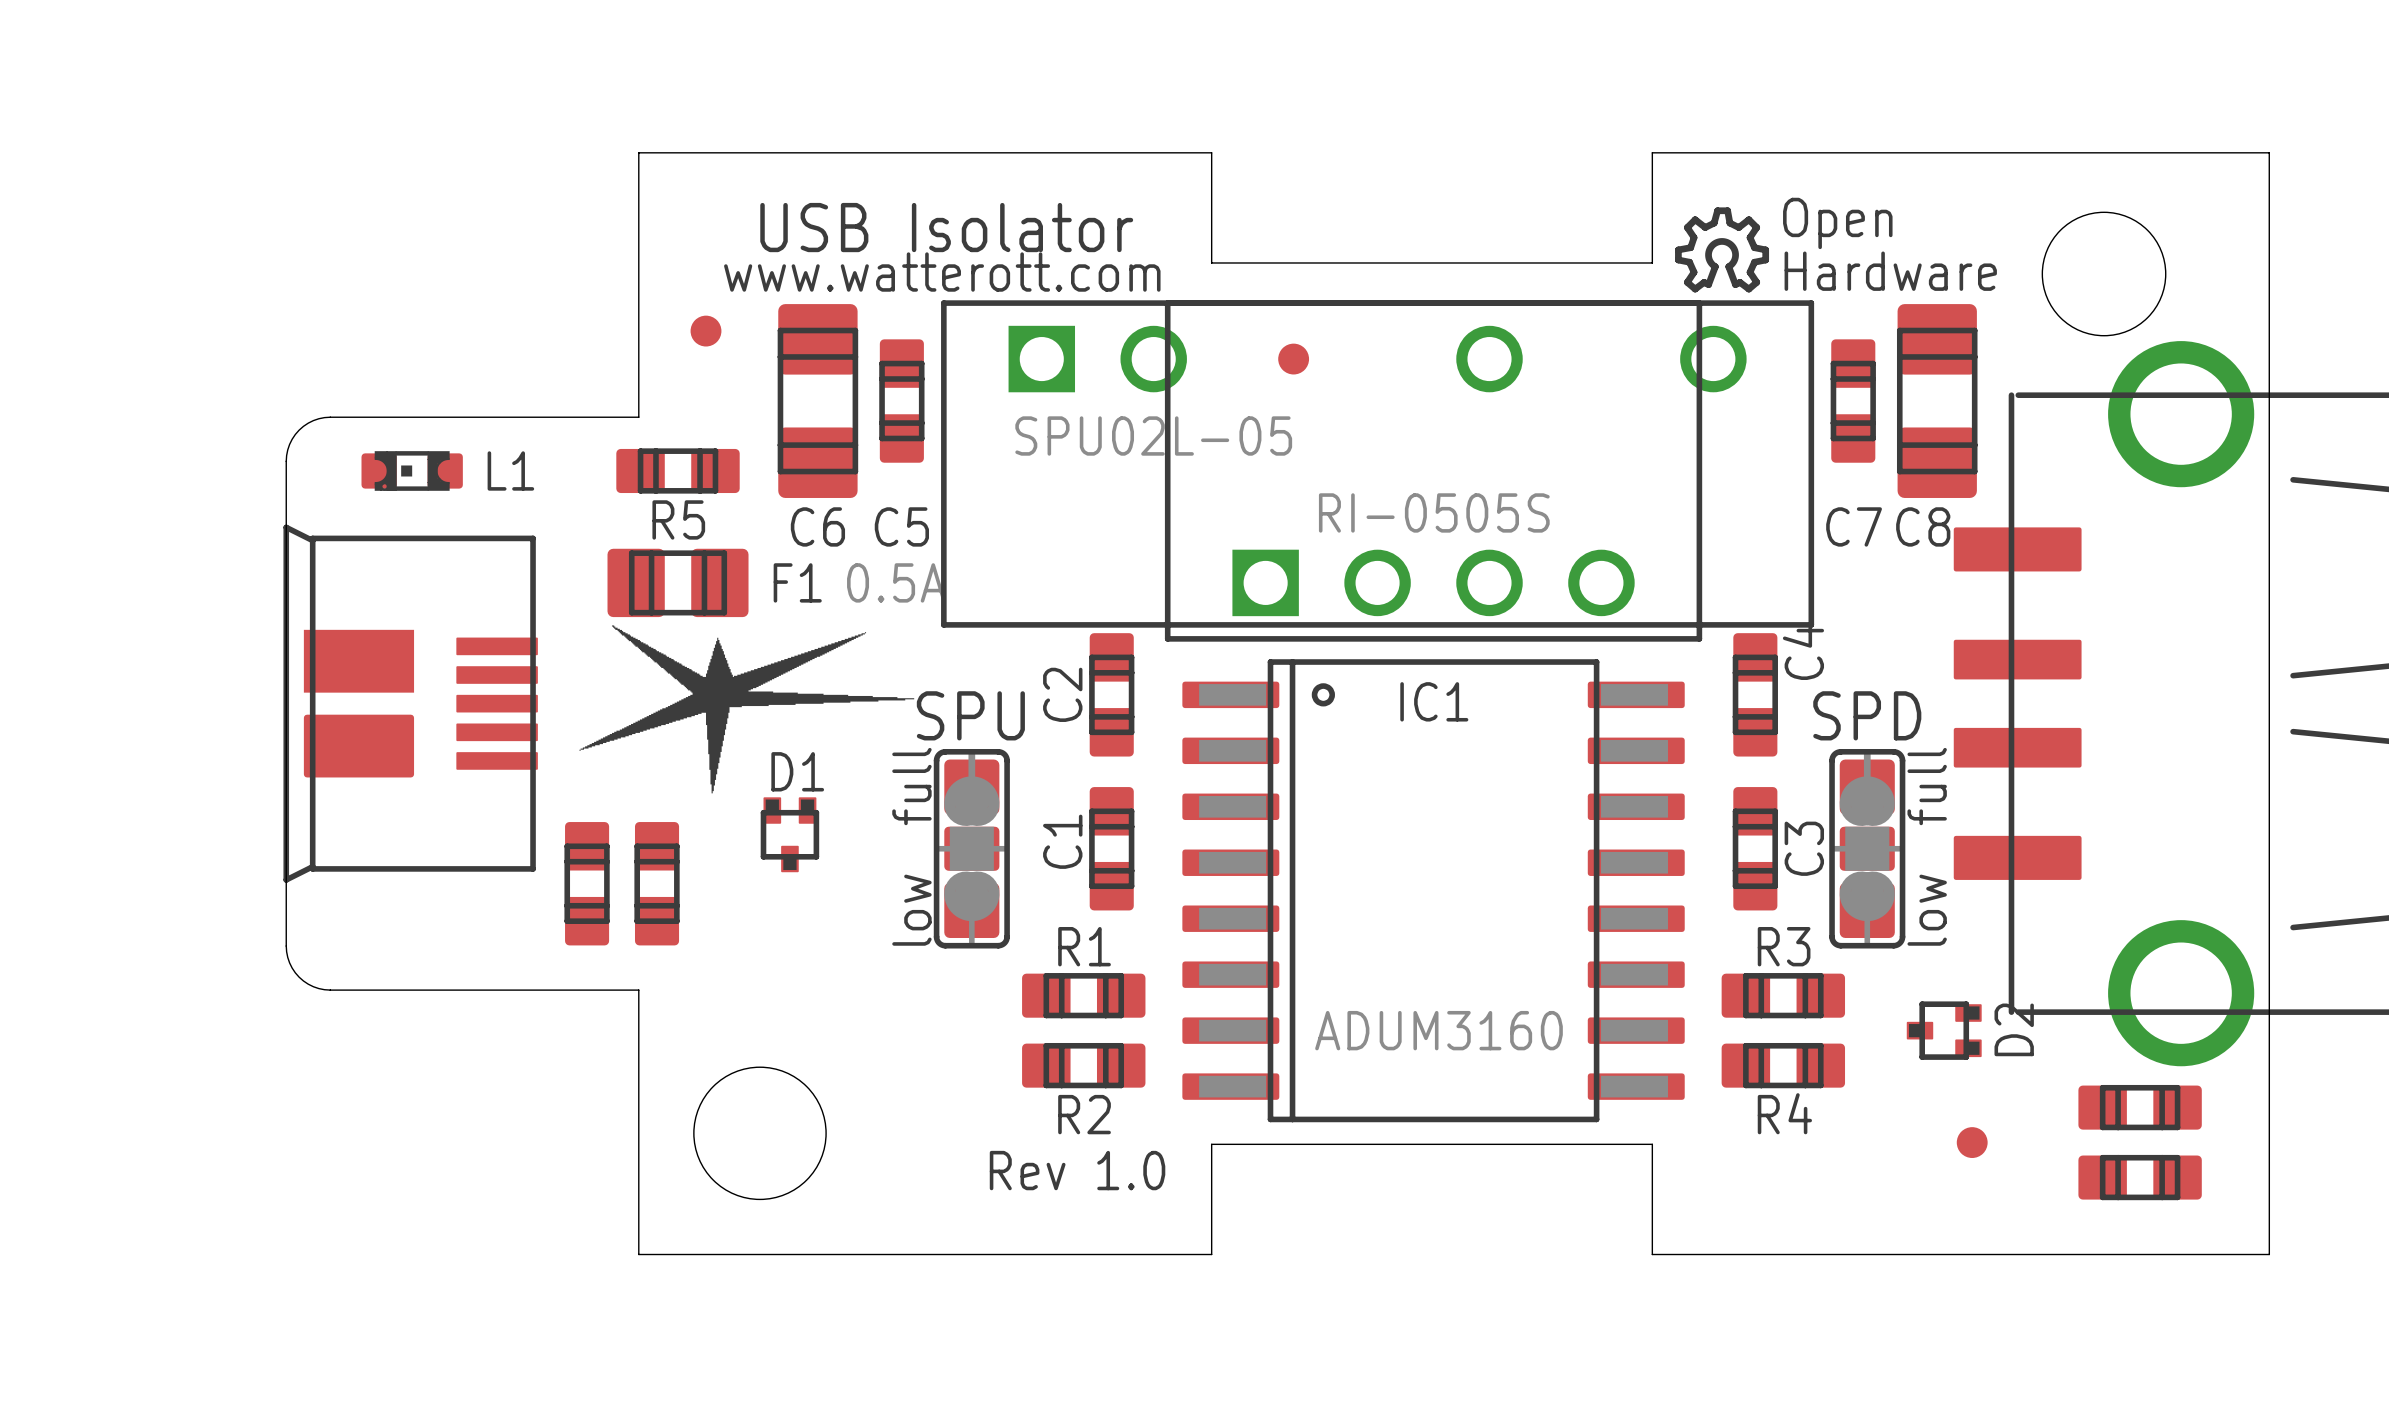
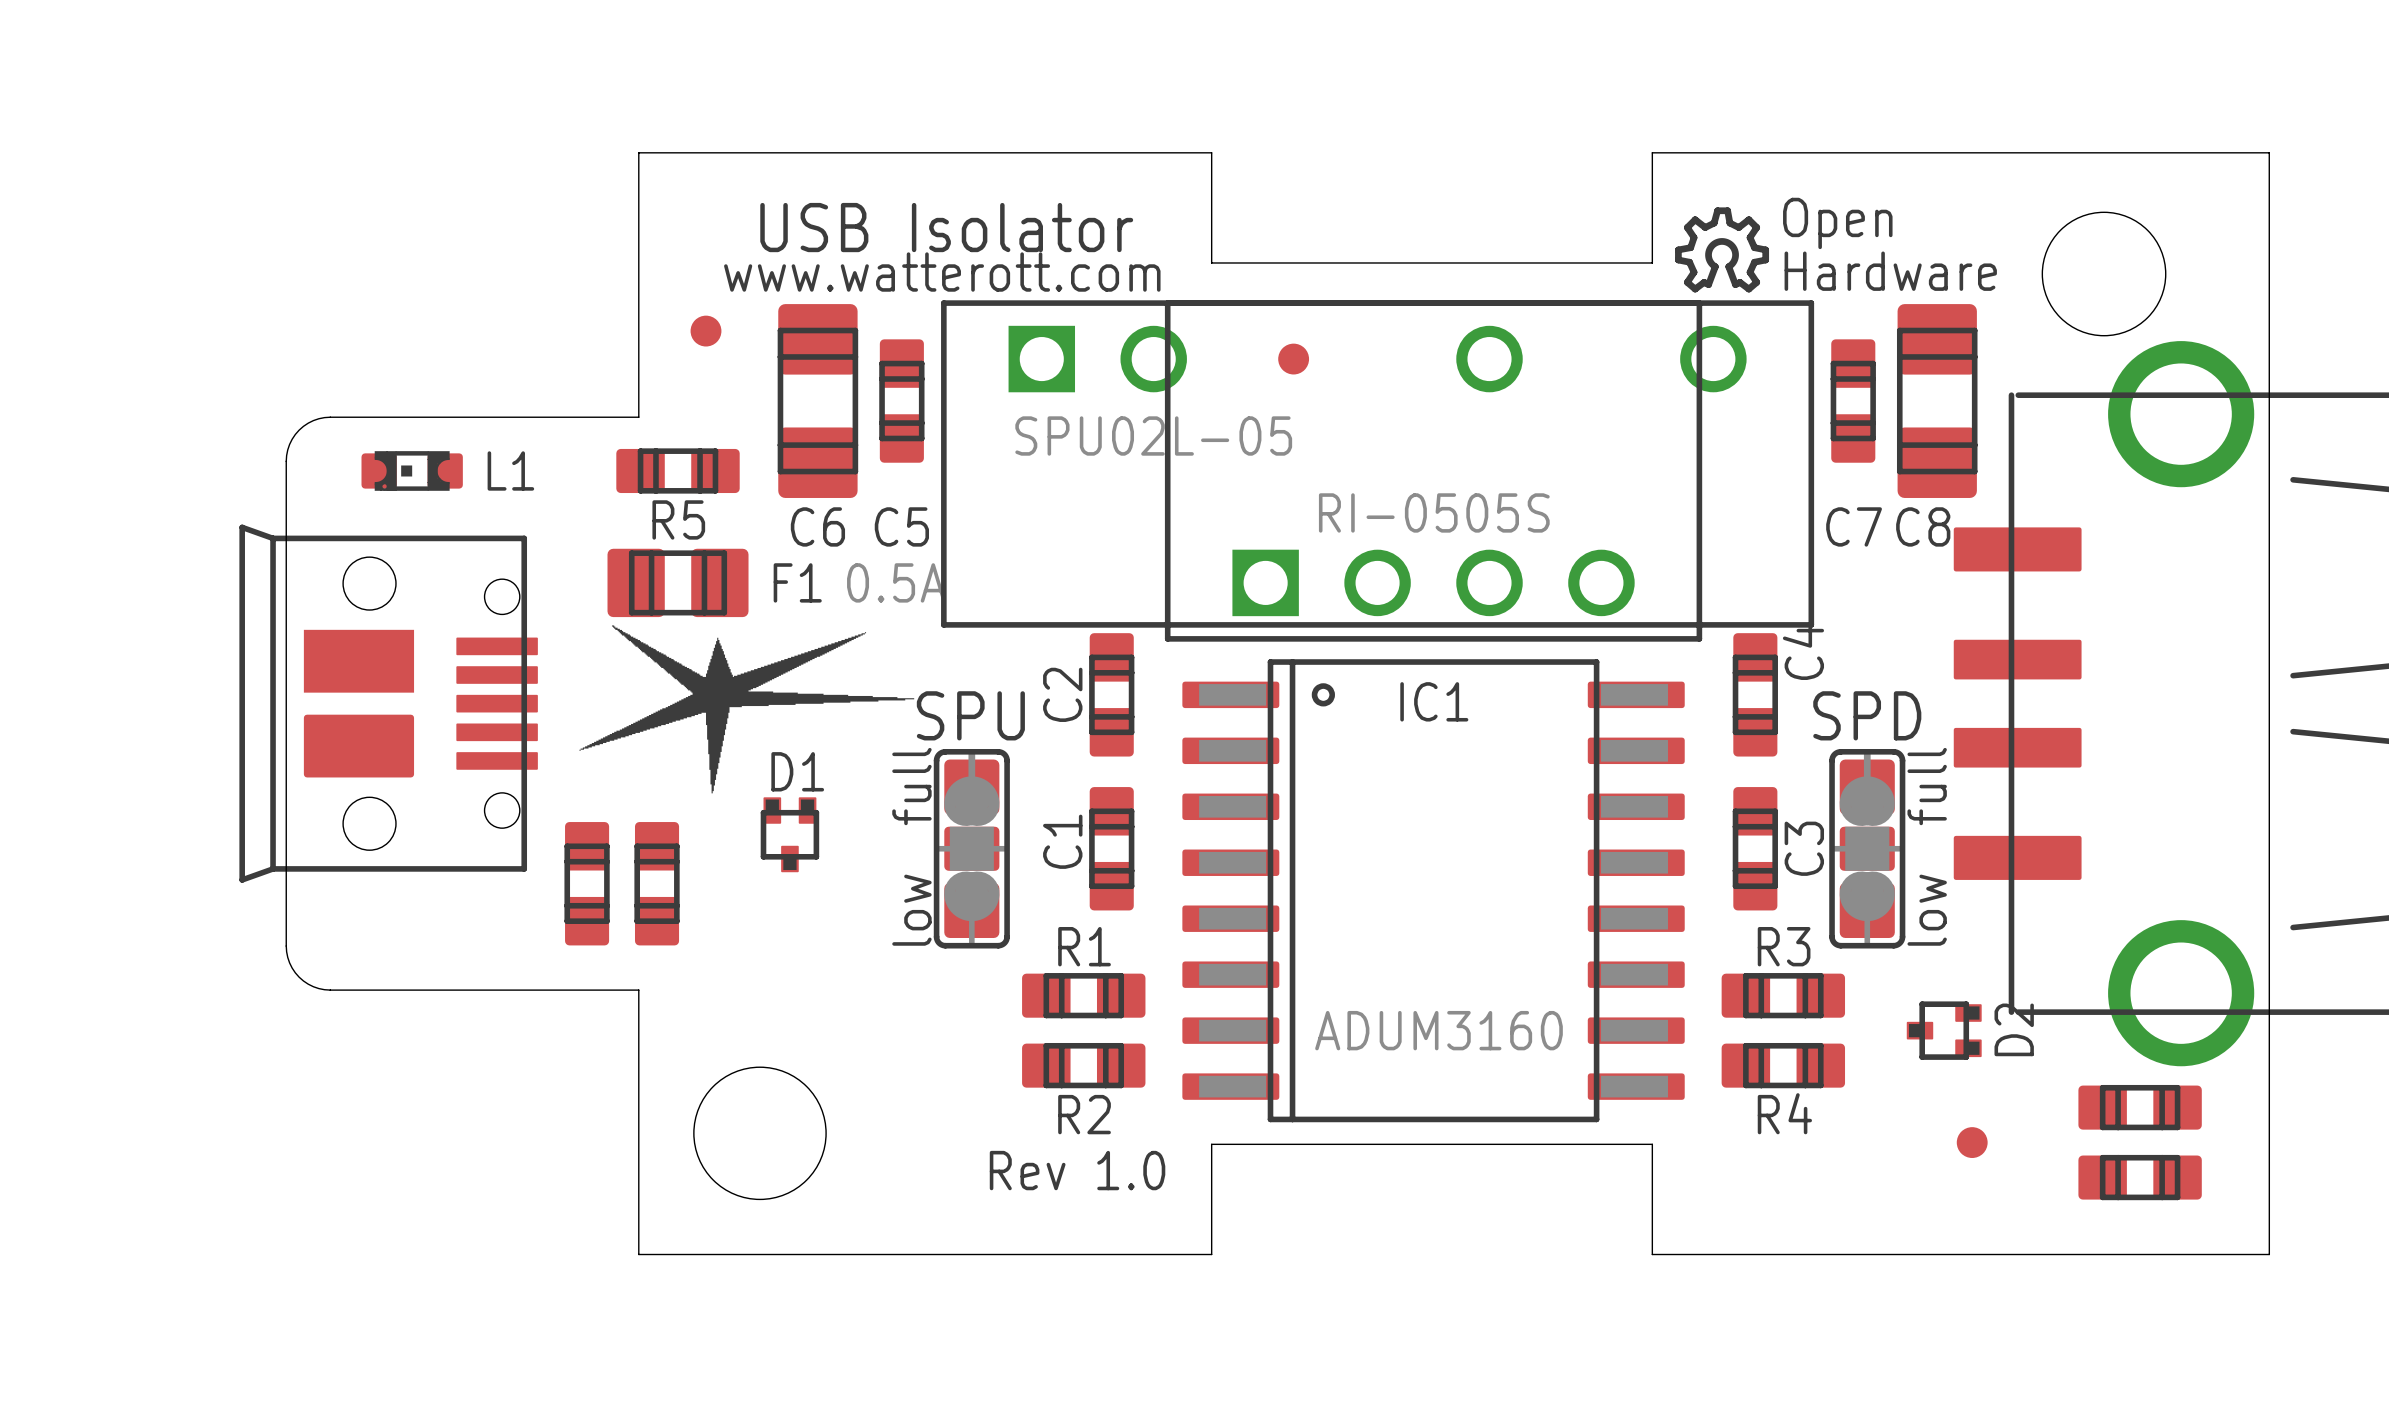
part footprint: [283, 524, 538, 883] -> [239, 524, 538, 883]

